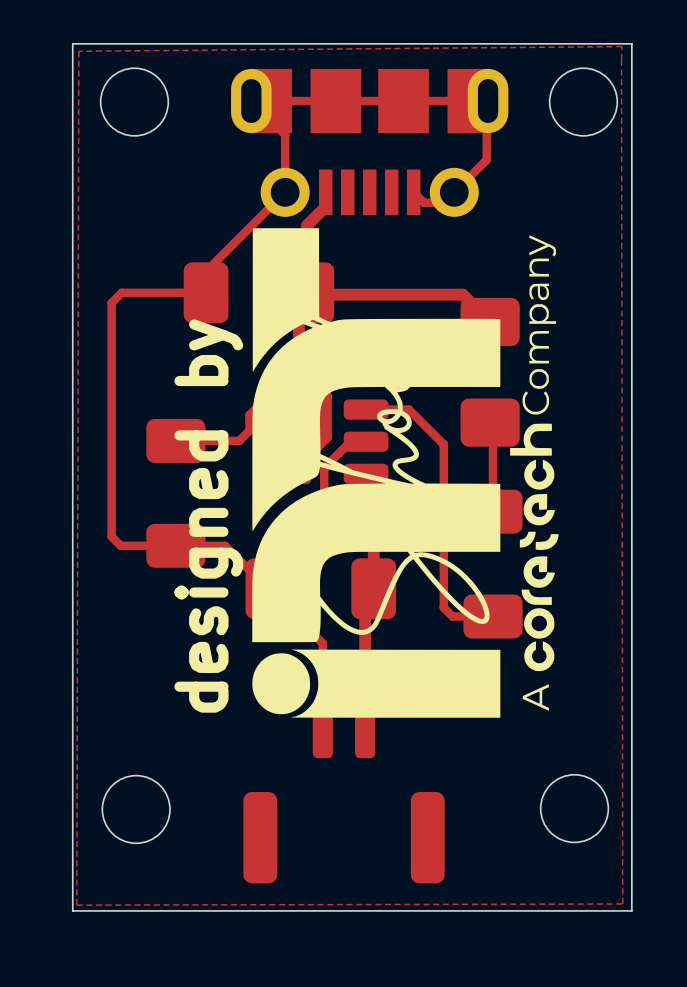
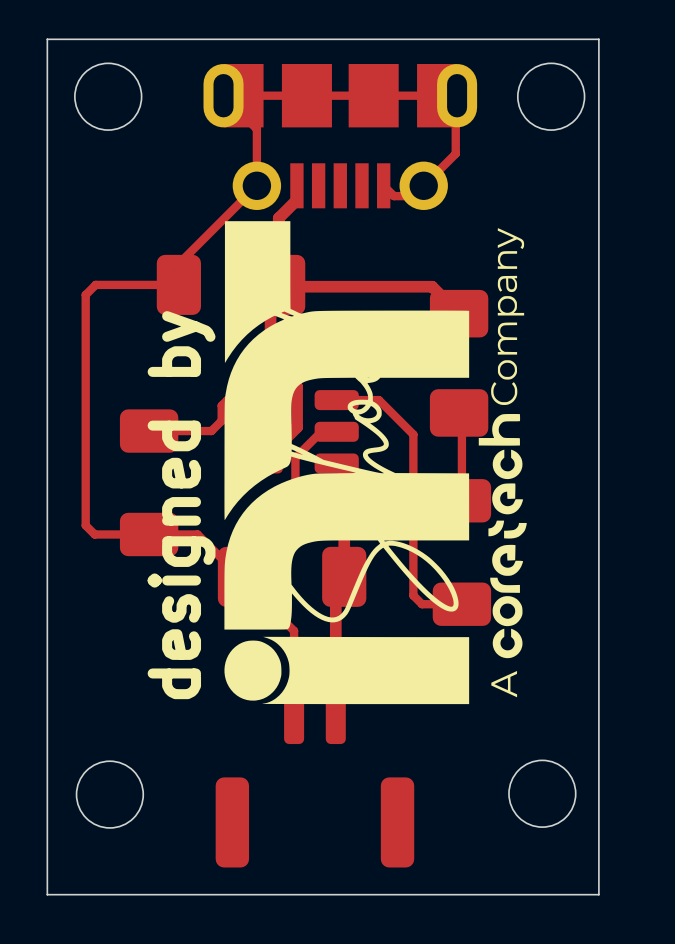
top zone outline: (622, 46) (78, 51) (76, 905) (622, 903) (622, 46) -> none

